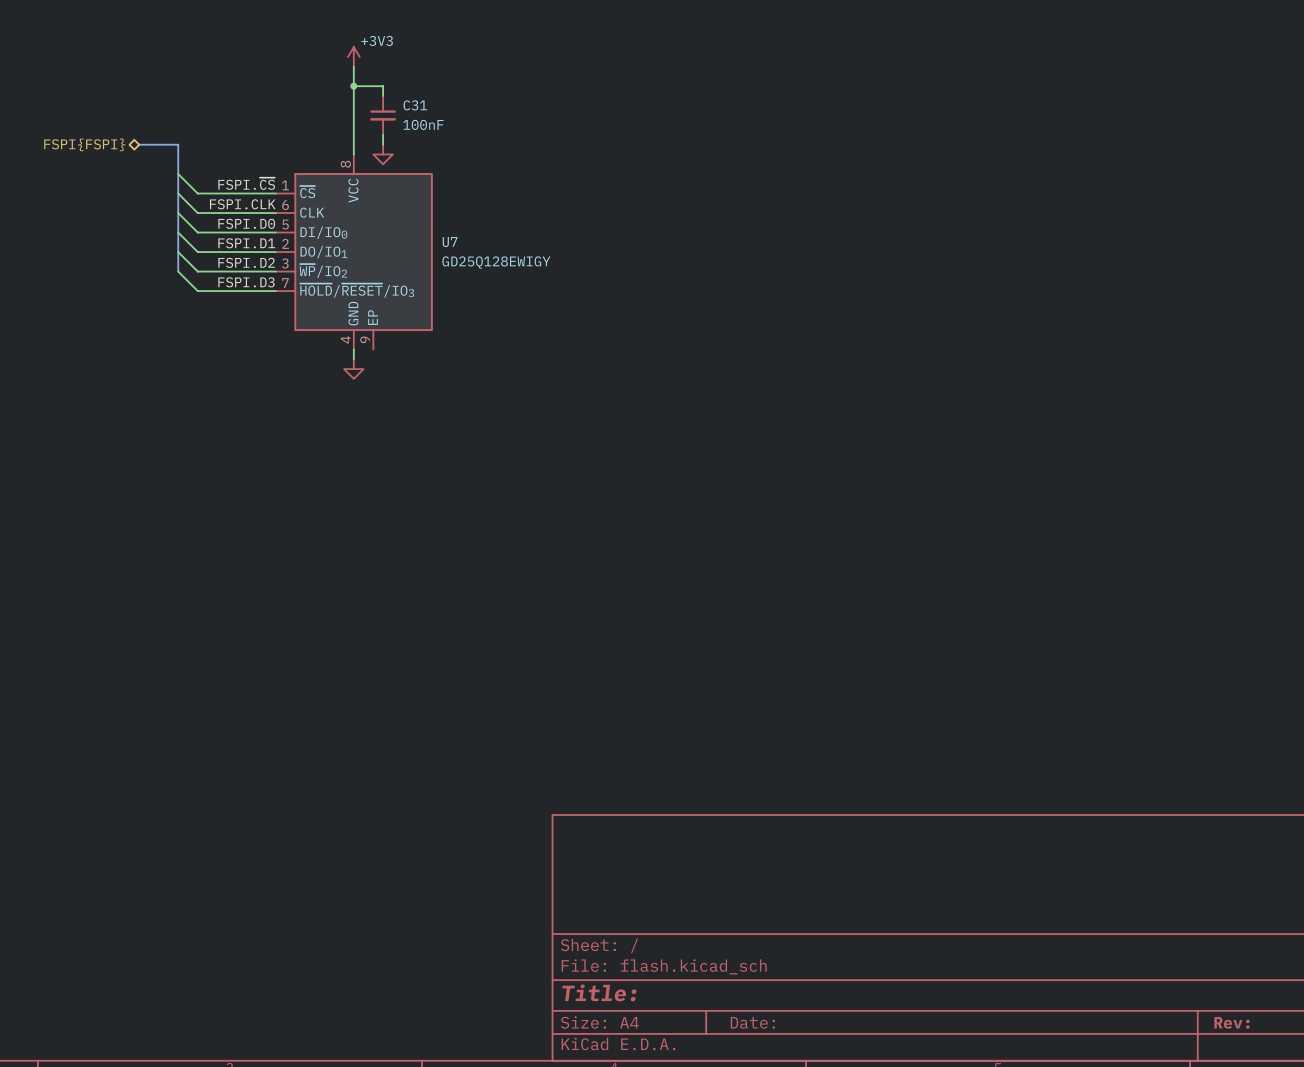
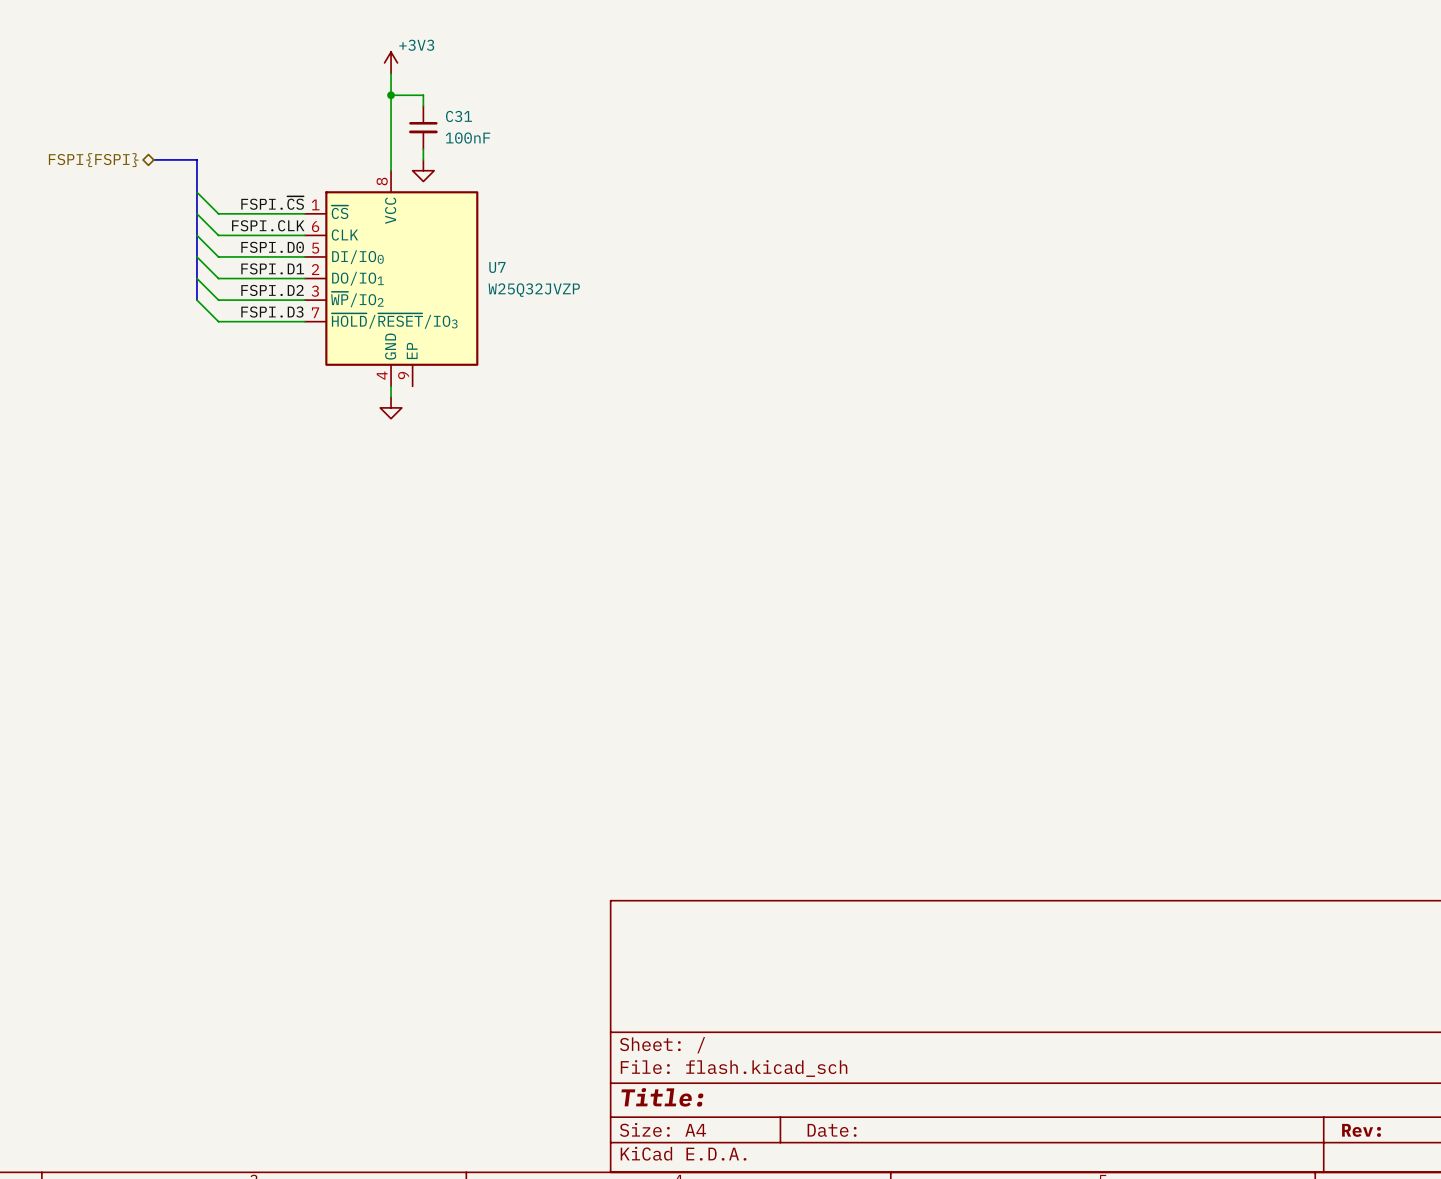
U7 value: GD25Q128EWIGY (496, 262) -> W25Q32JVZP (534, 290)

